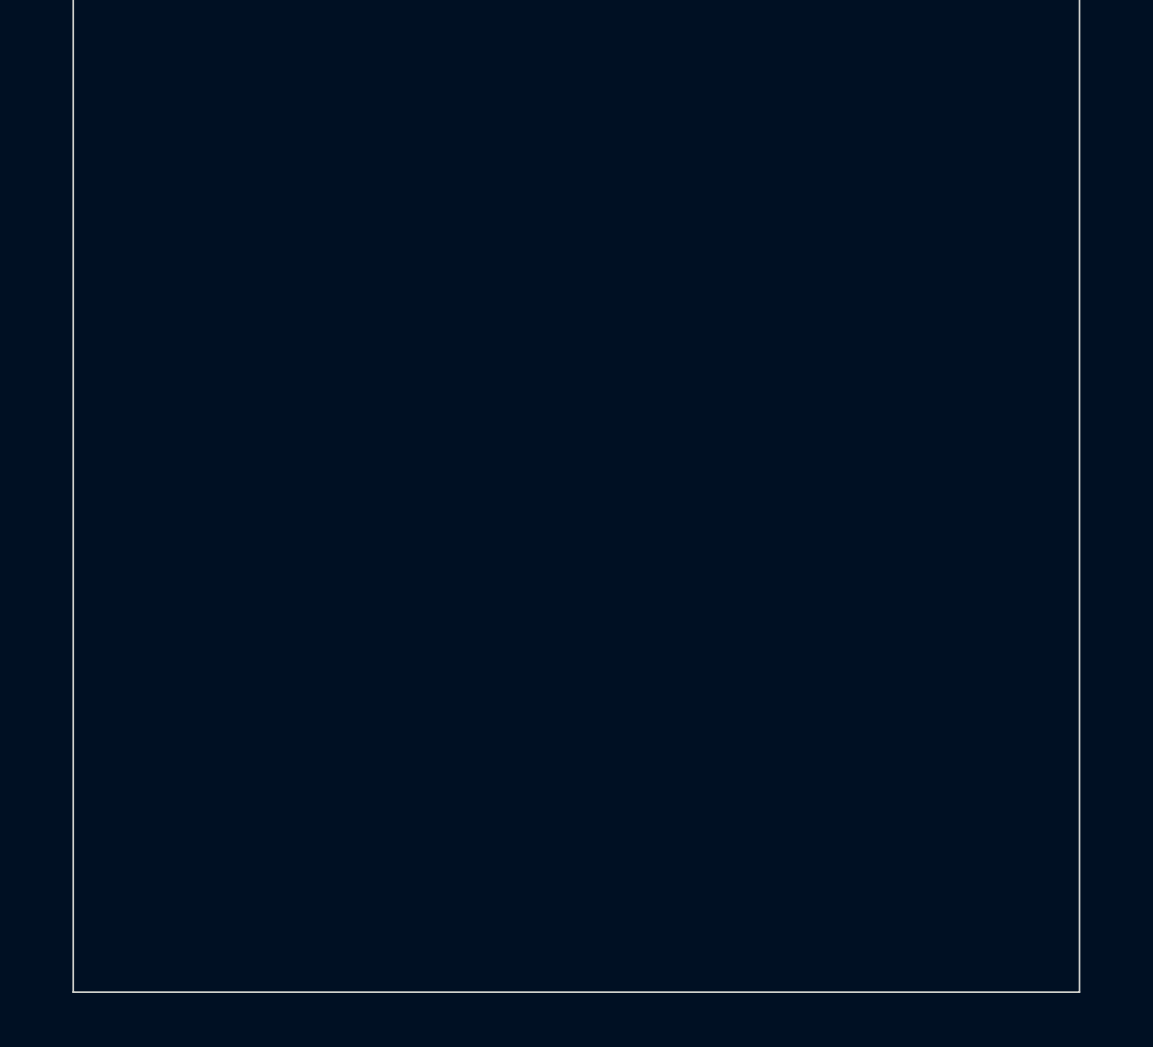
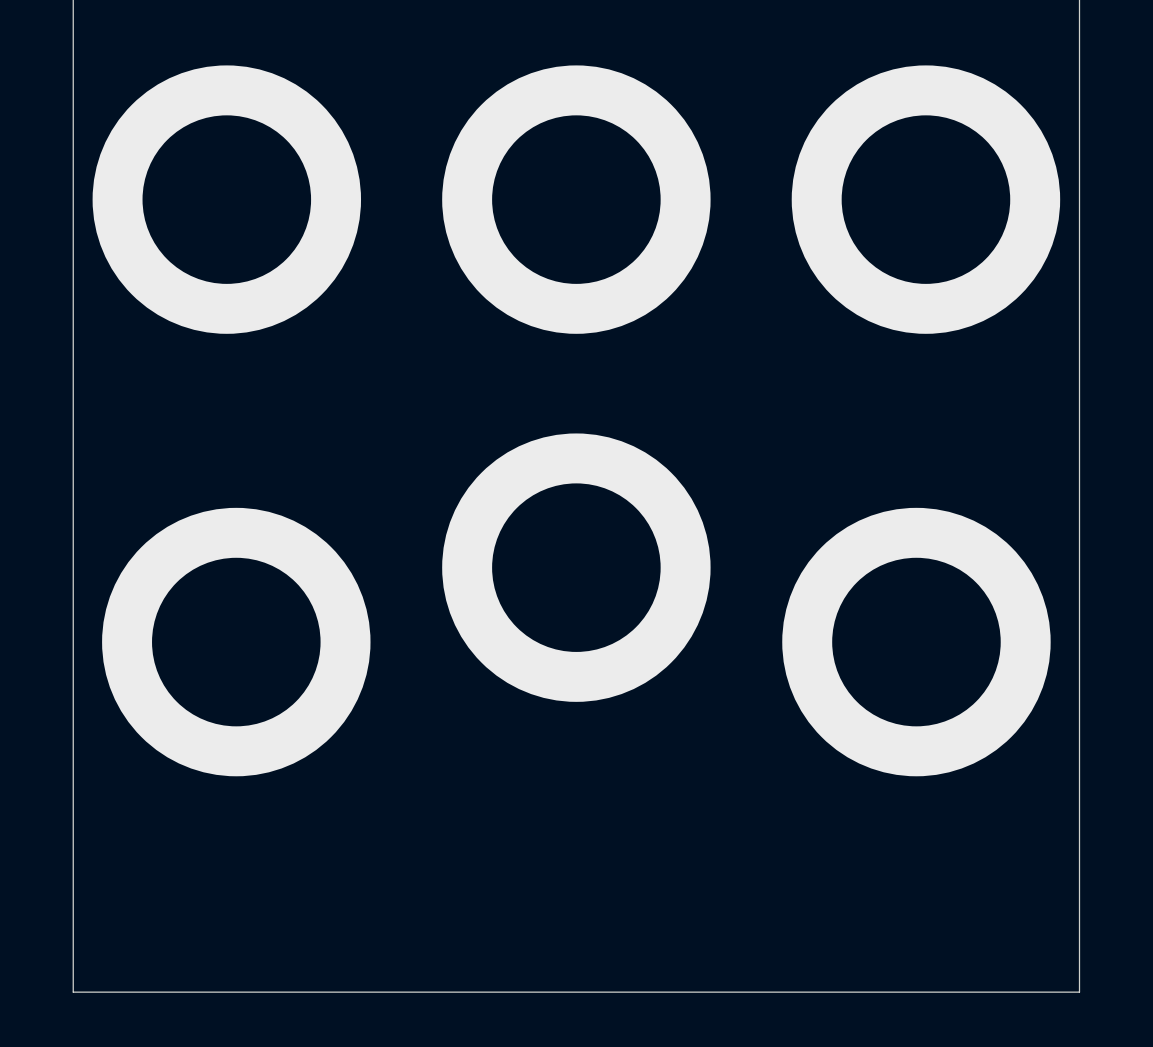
via: none -> (226, 199)
via: none -> (576, 199)
via: none -> (925, 199)
via: none -> (576, 567)
via: none -> (236, 642)
via: none -> (916, 642)

